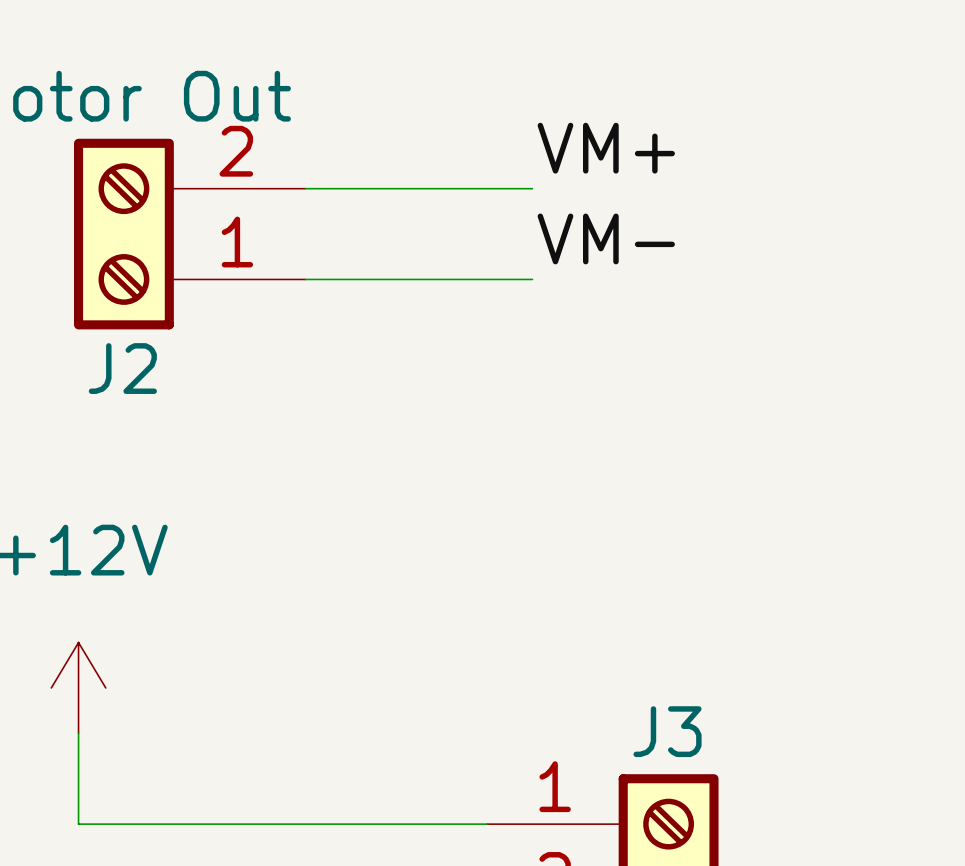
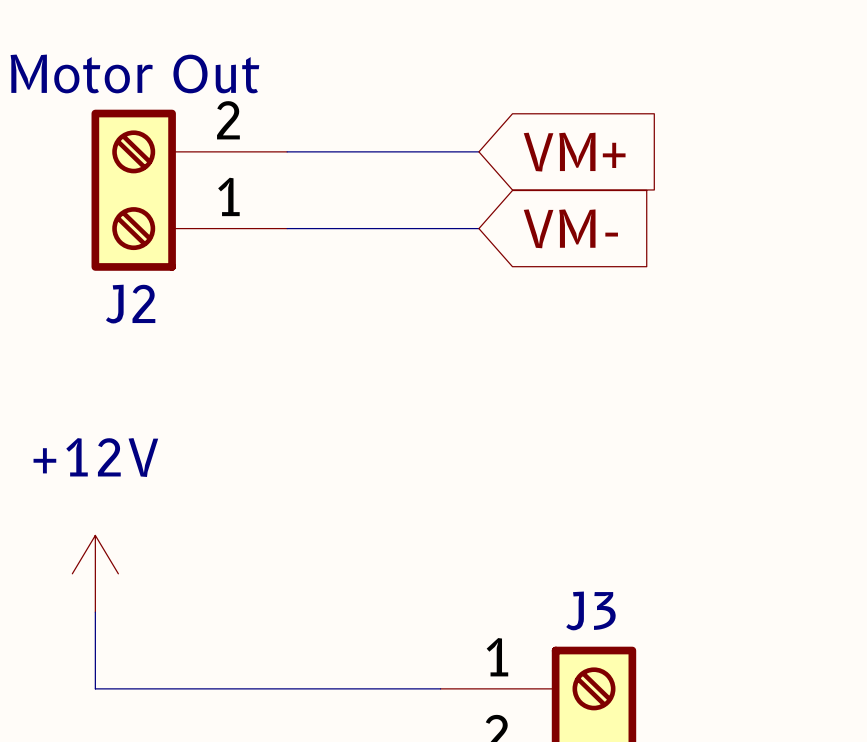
label: VM+ (606, 148) -> none
global label: none -> VM+ (574, 152)
label: VM- (606, 238) -> none
global label: none -> VM- (570, 228)

